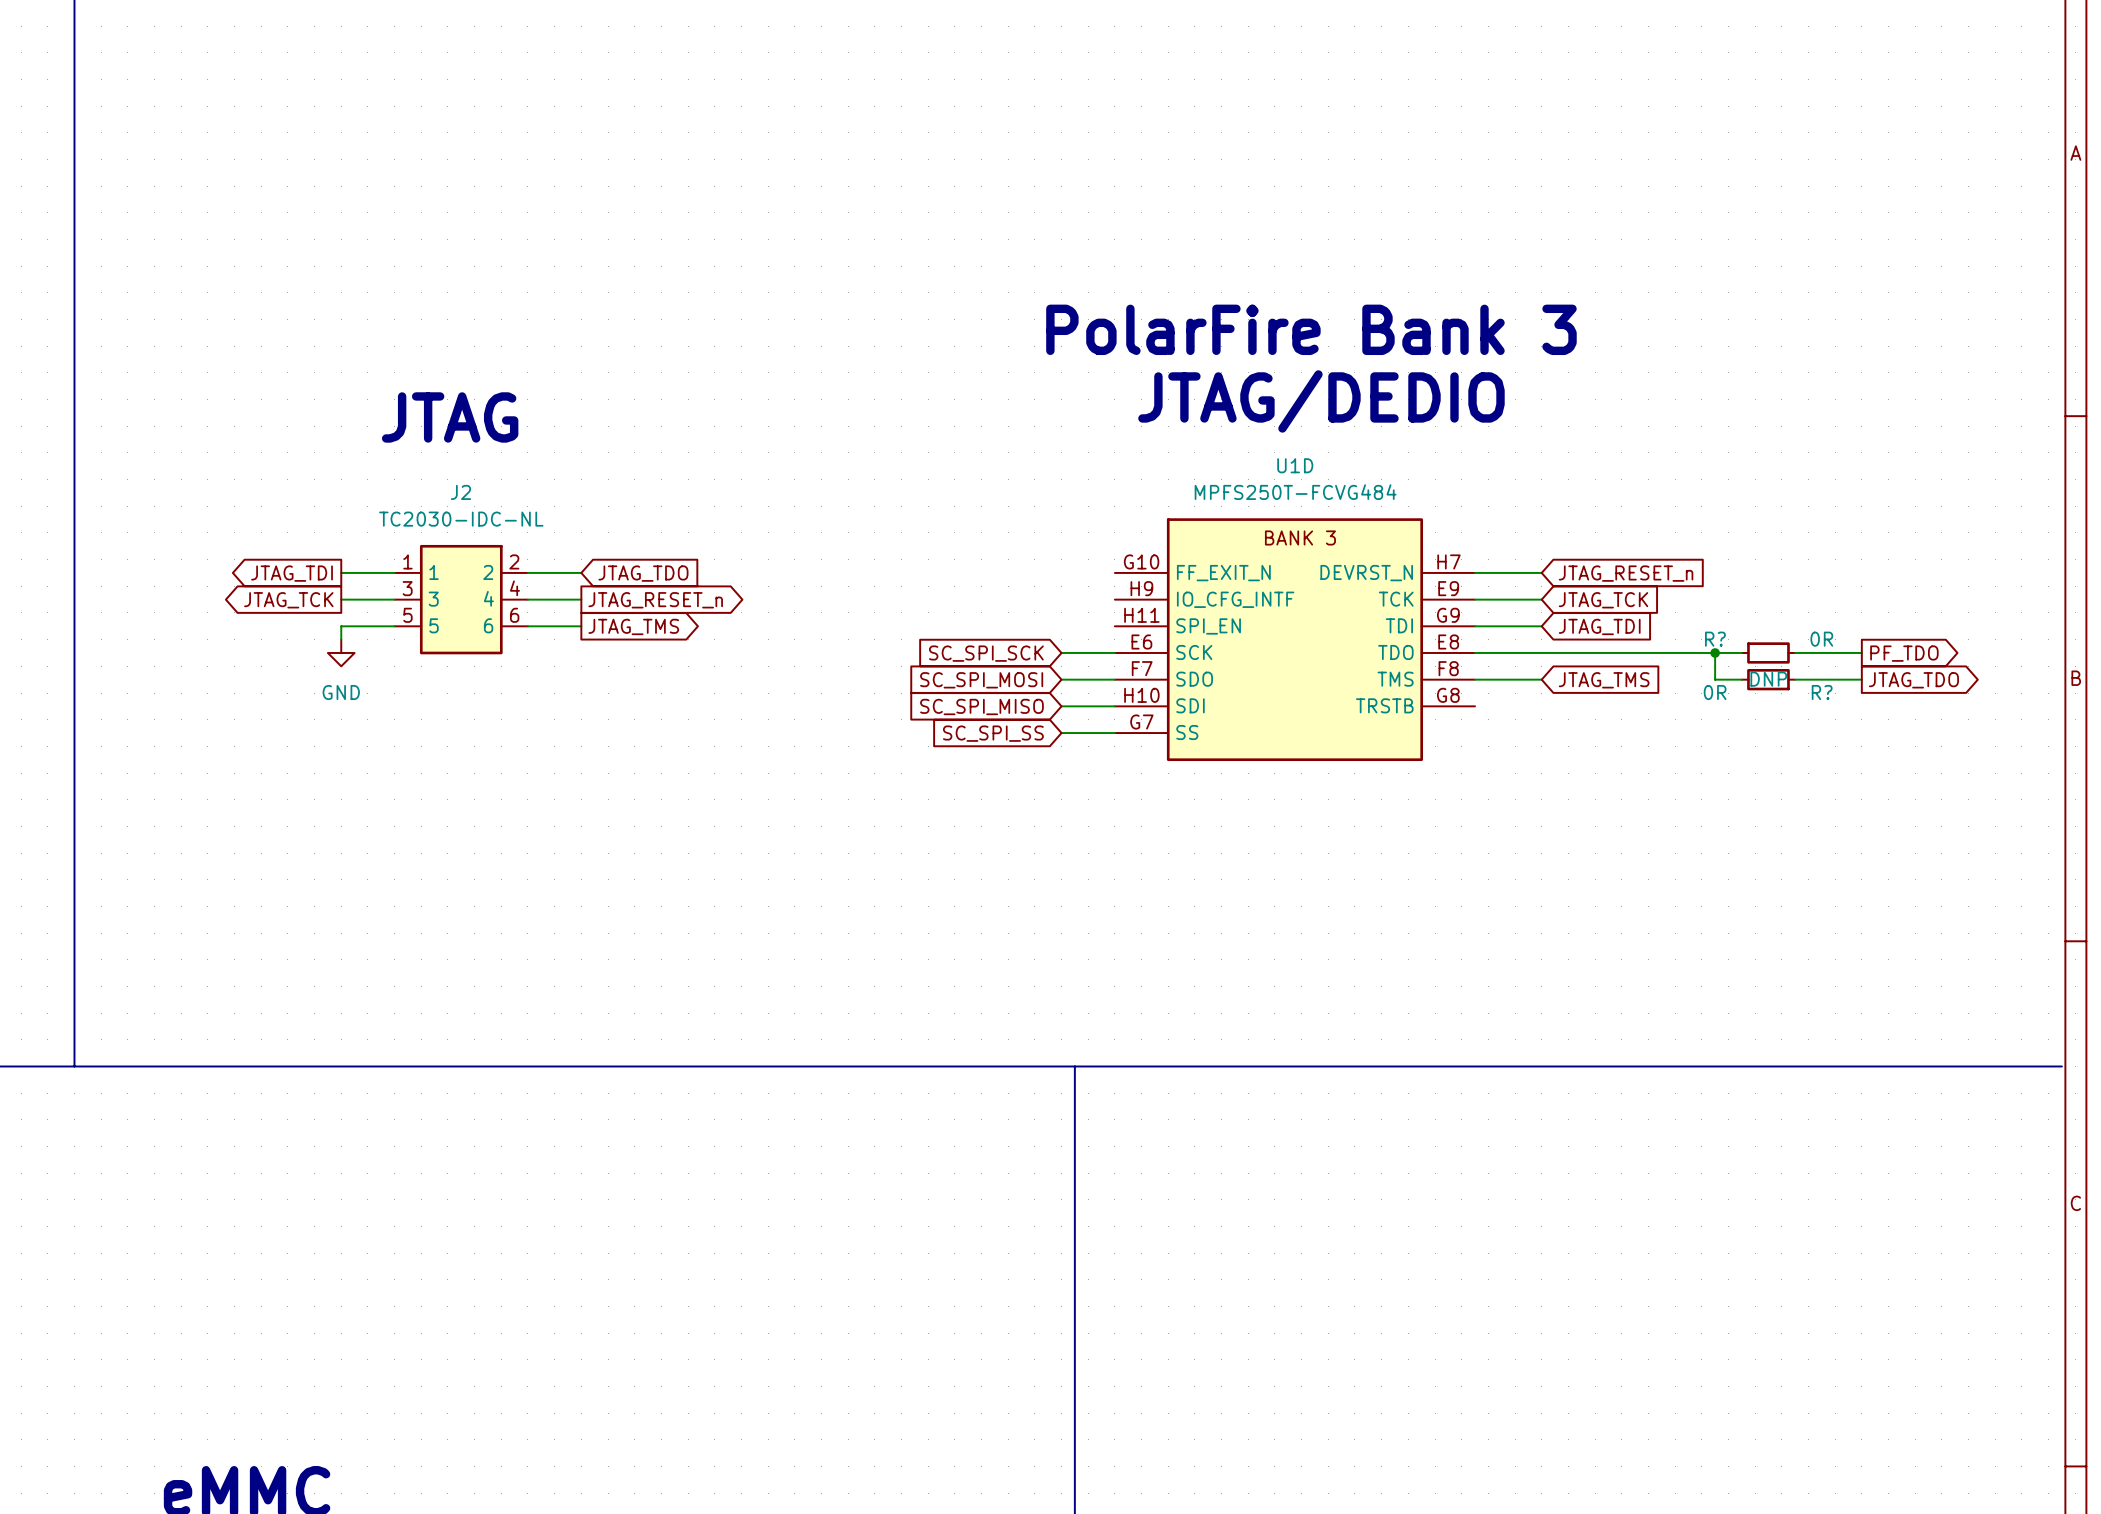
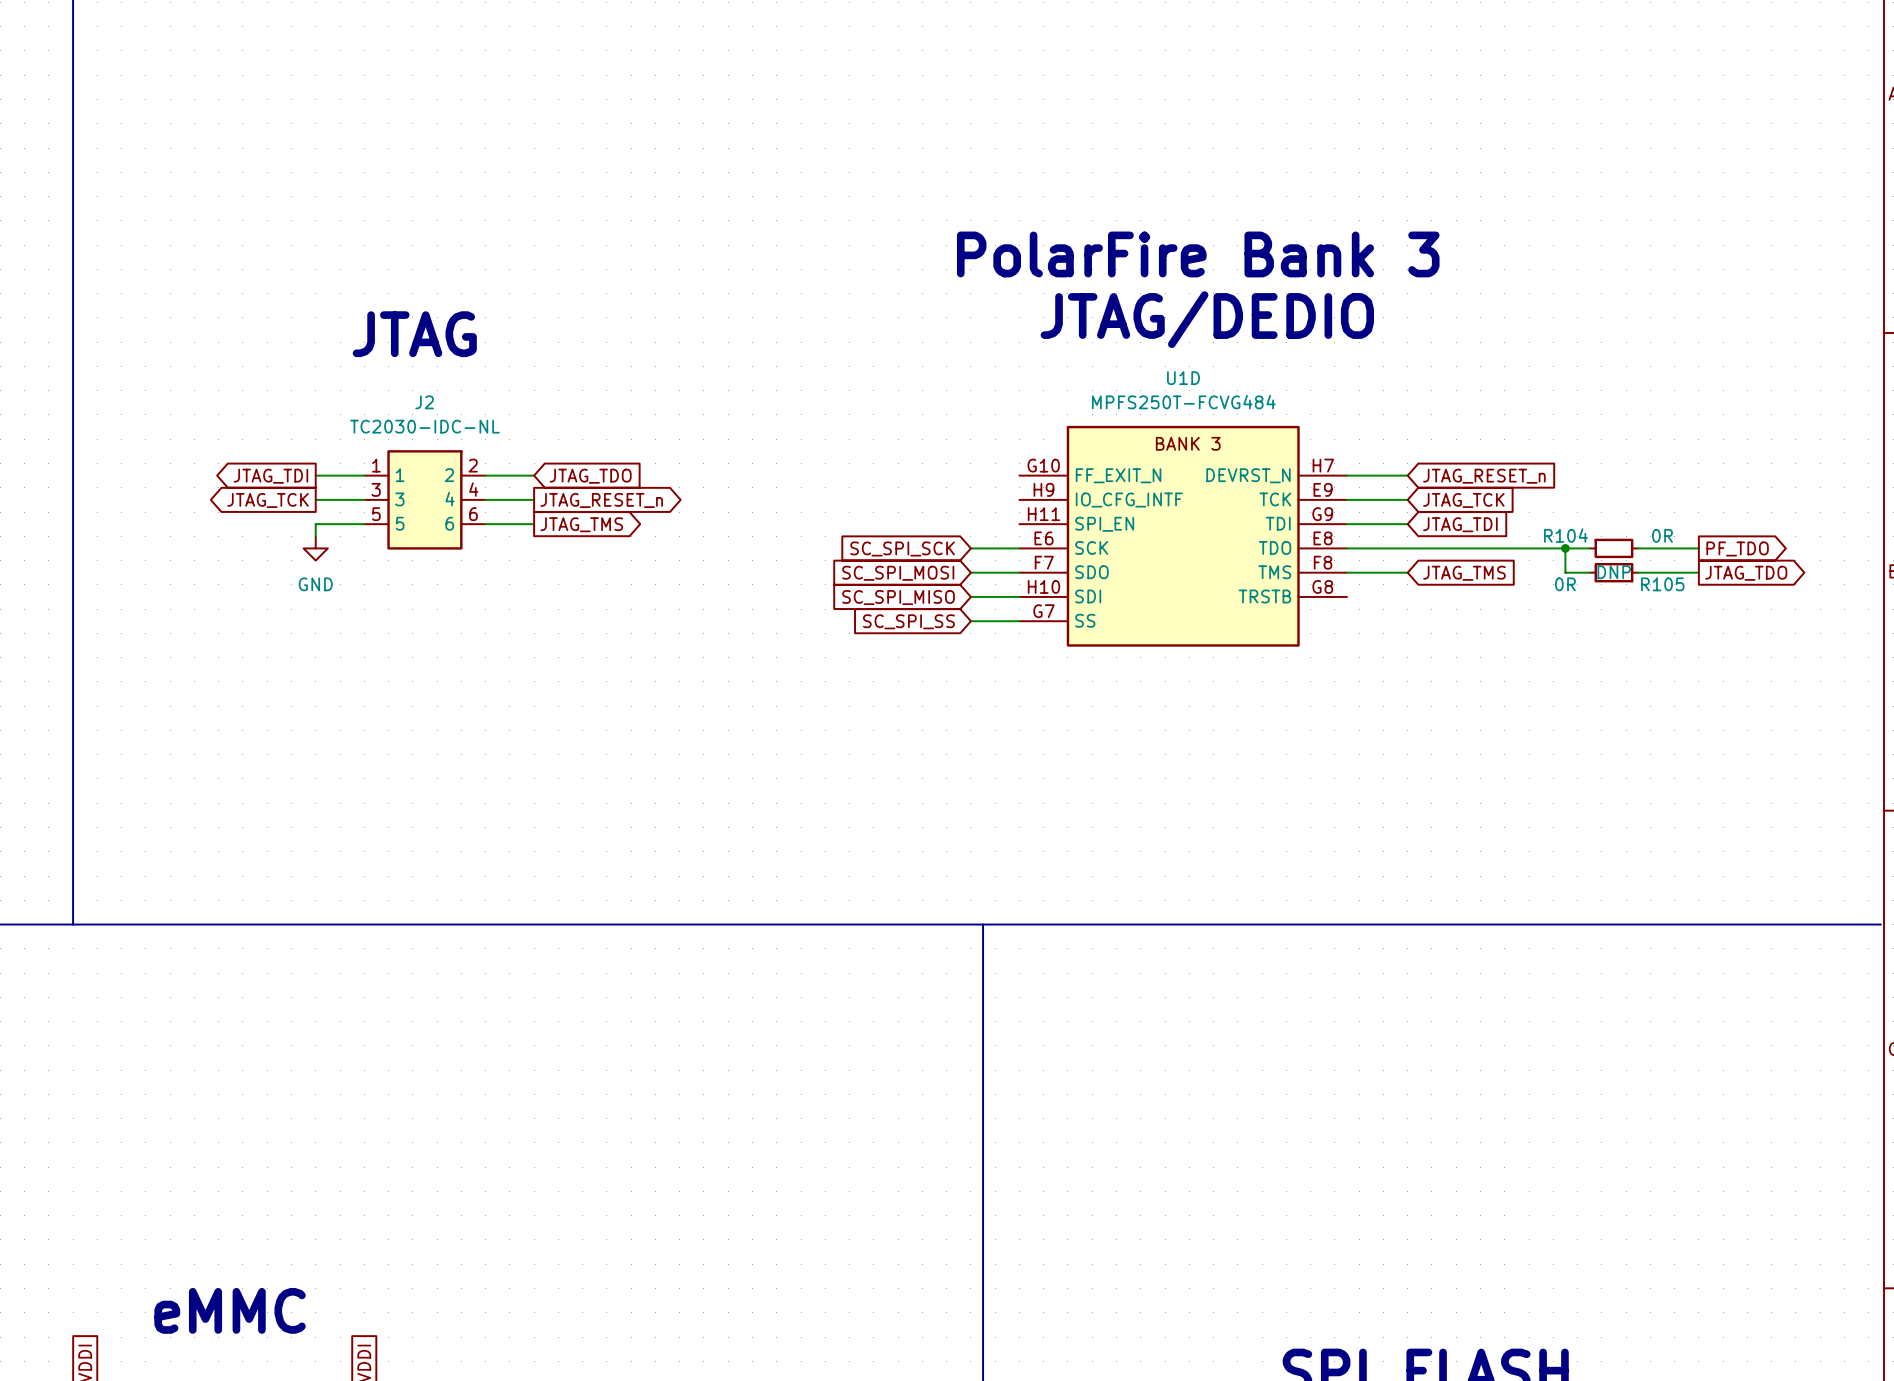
R? name: R? (1715, 639) -> R104 (1565, 535)
R? name: R? (1822, 692) -> R105 (1662, 584)

